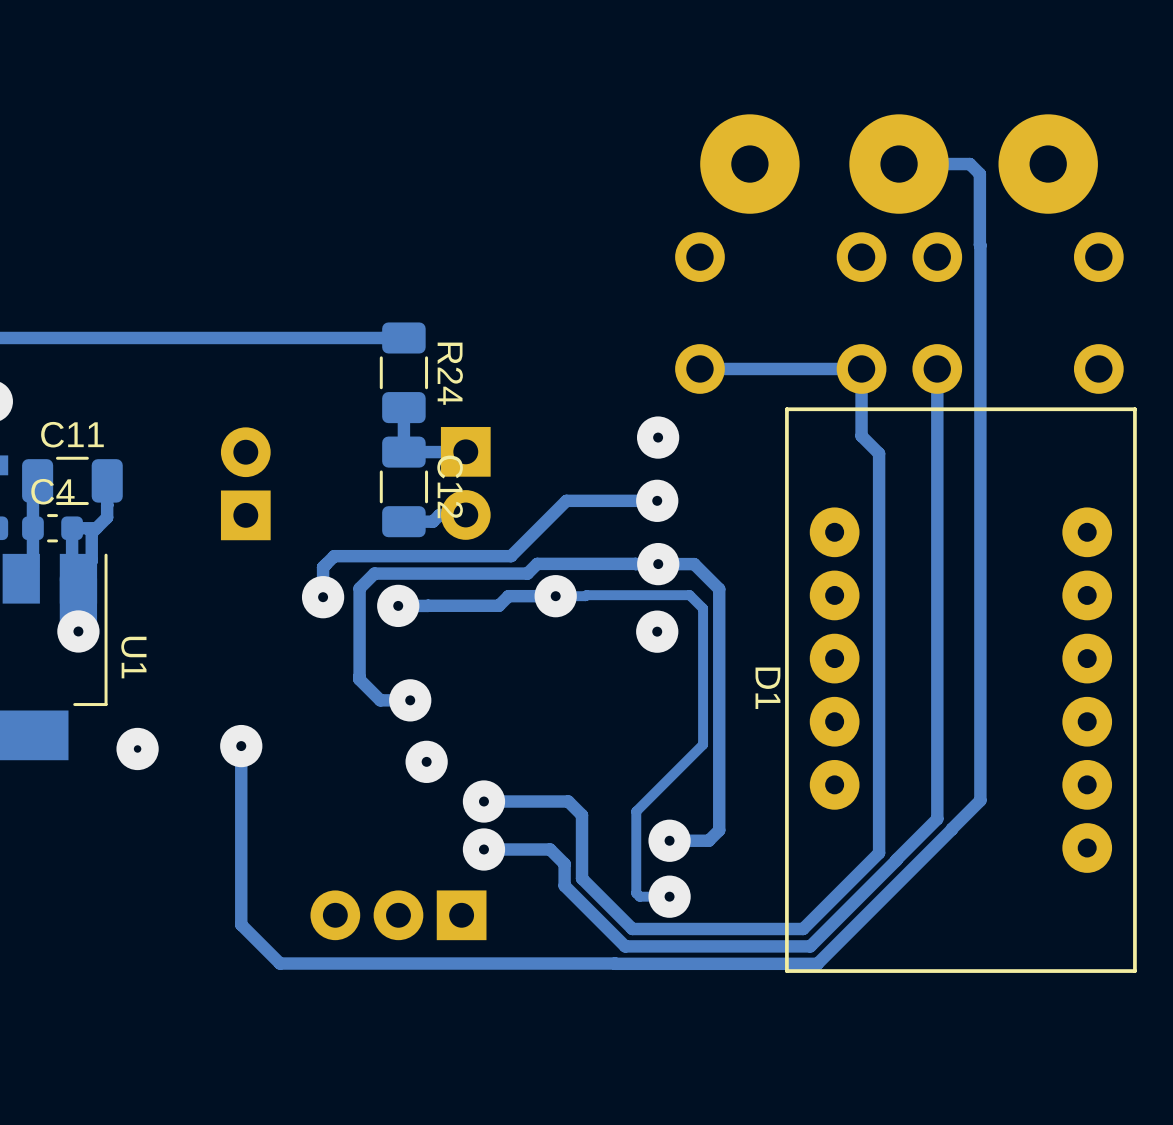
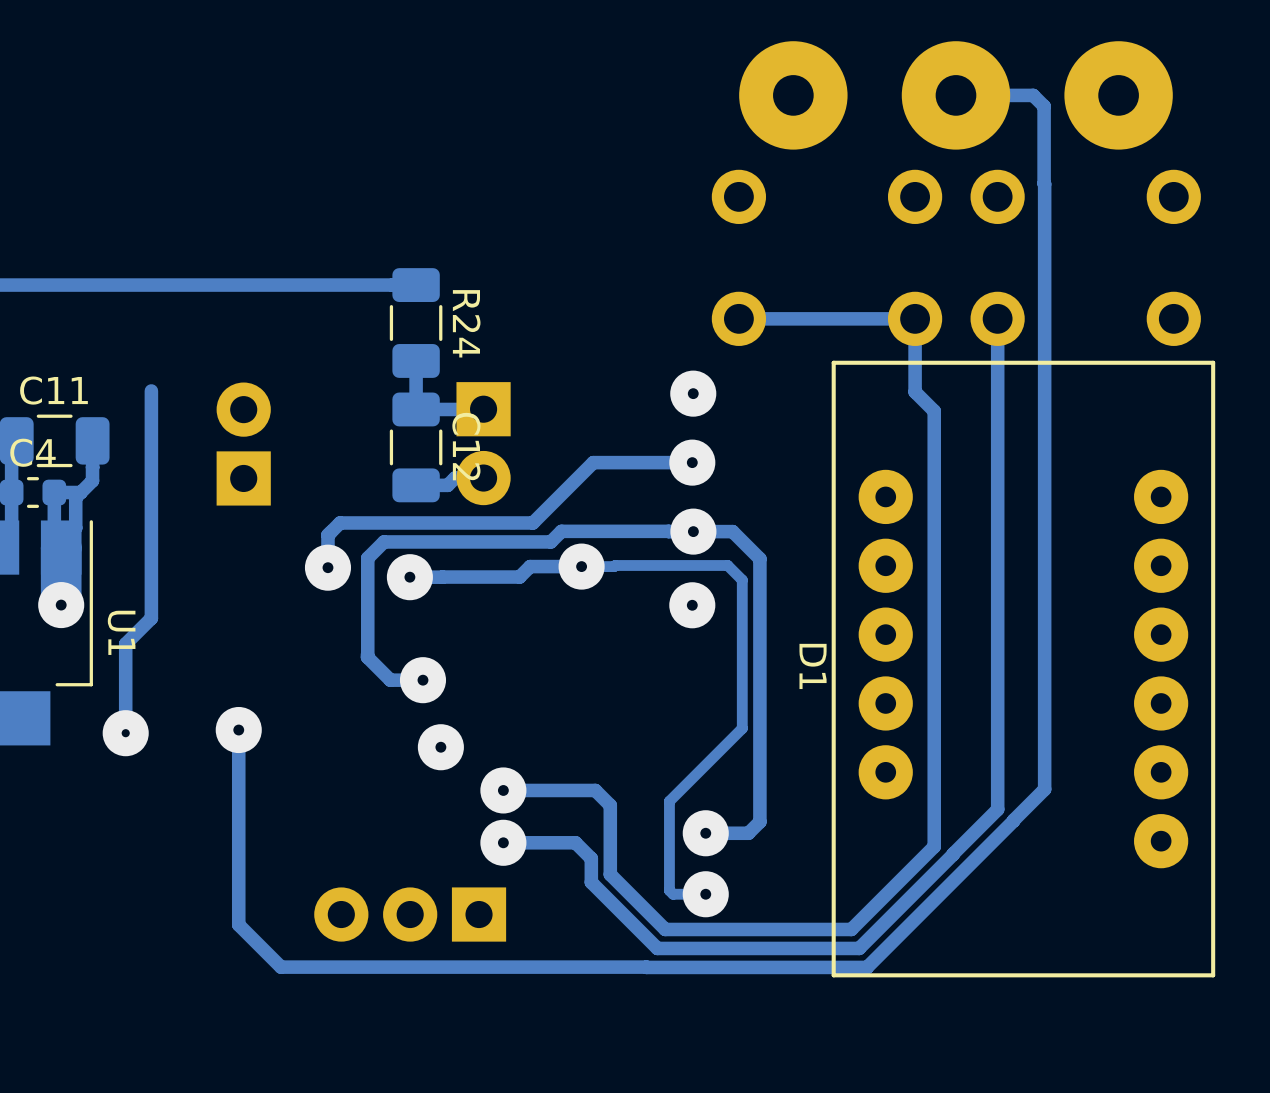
track: none -> (151, 390) (151, 618) (125, 643) (125, 733)

